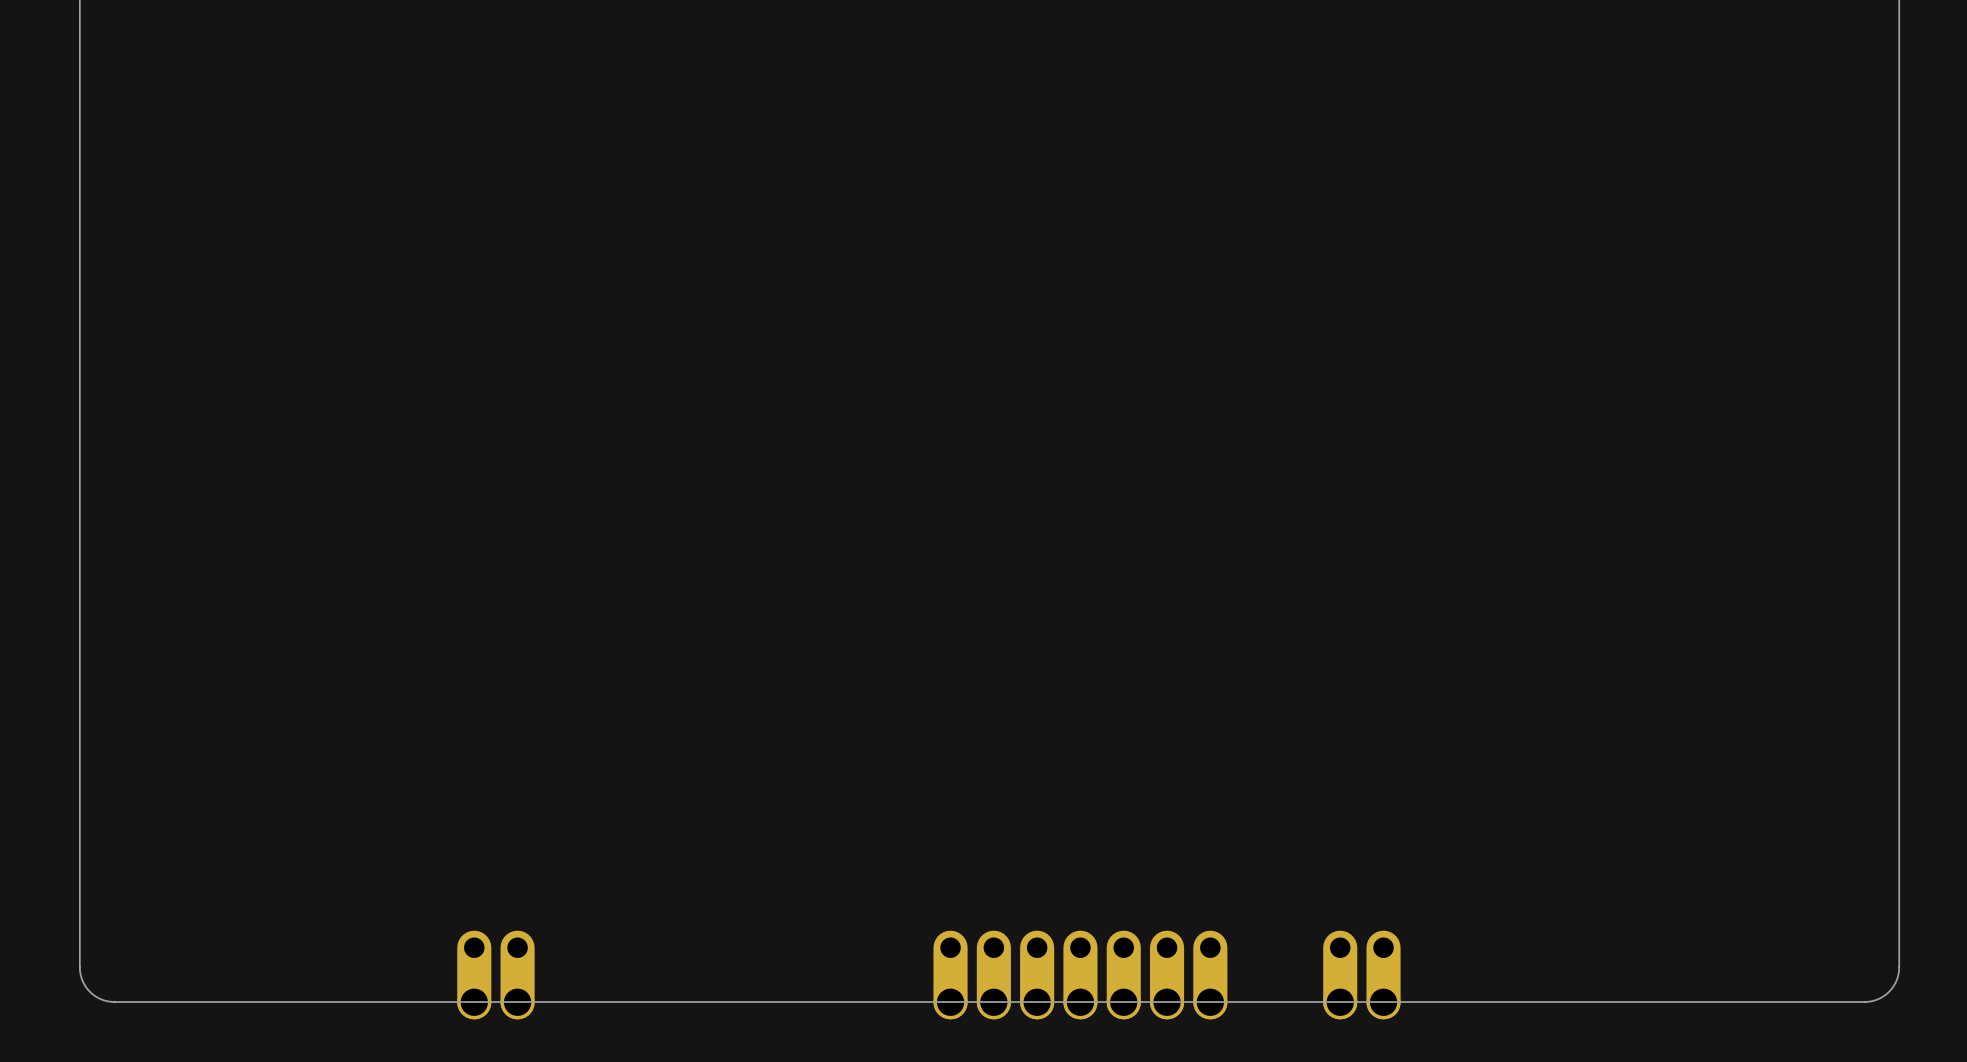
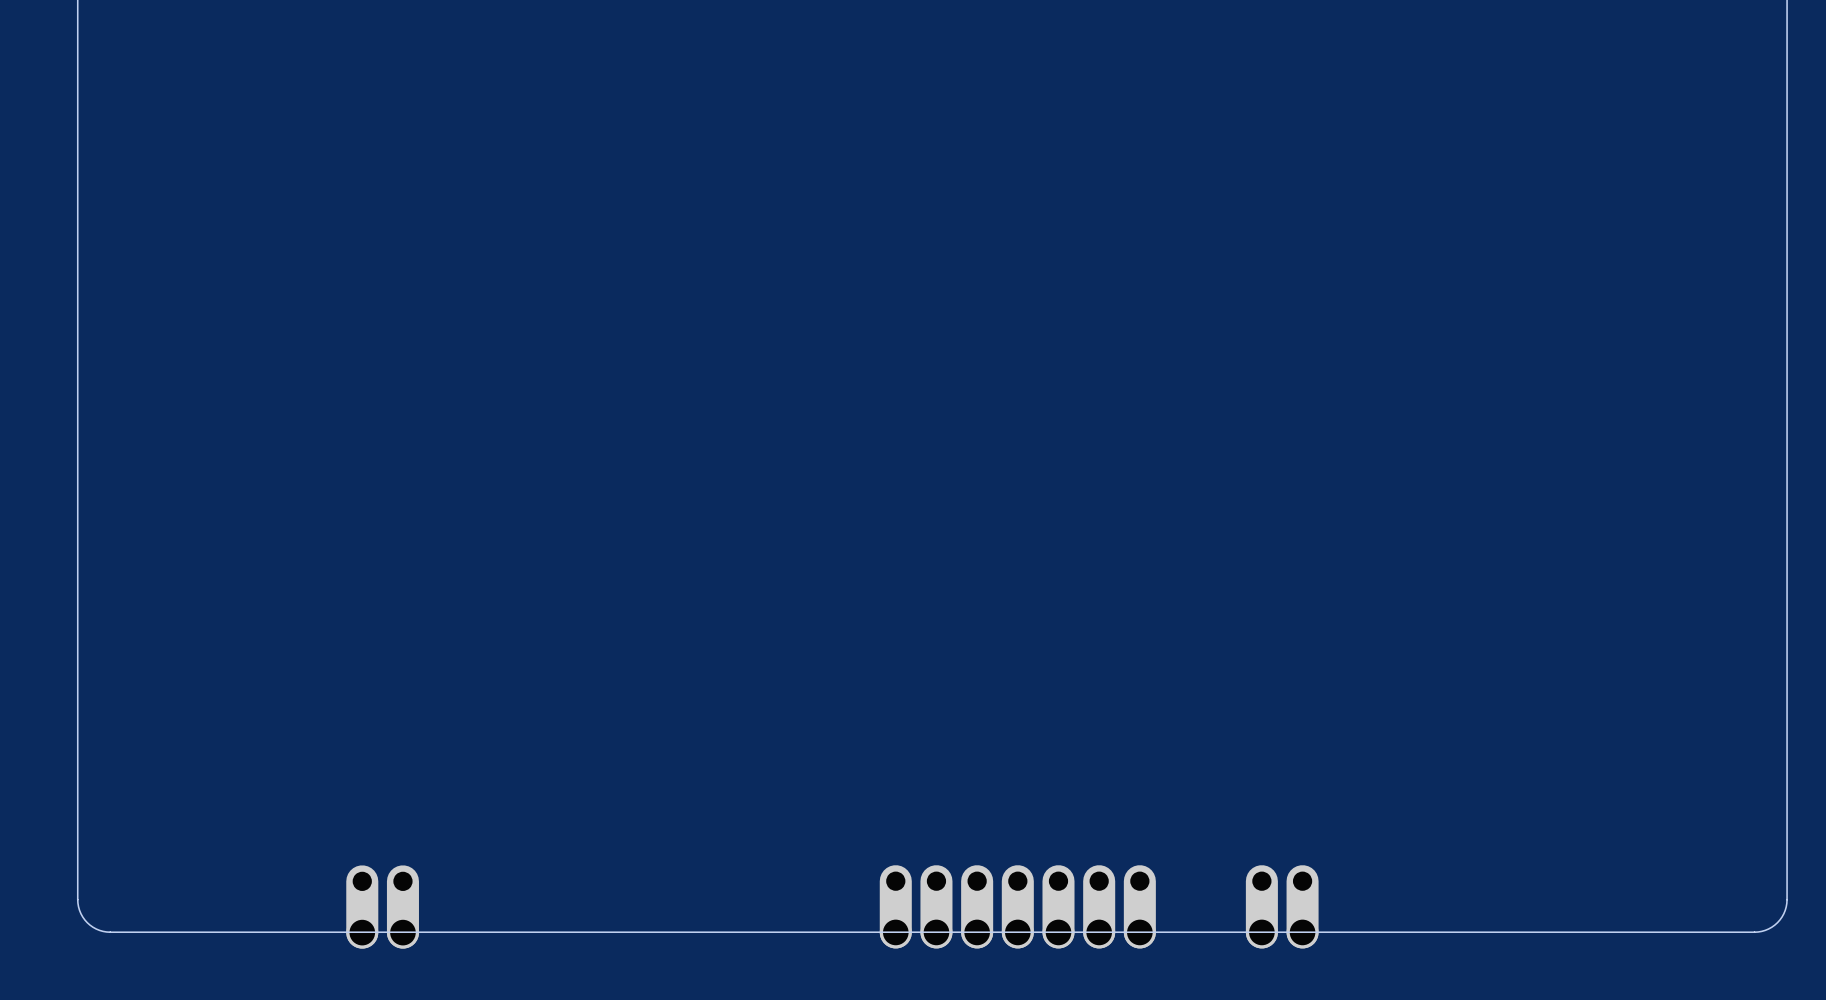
part: none -> (362, 906)
part: none -> (402, 906)
part: (474, 975) -> none
part: (517, 975) -> none

